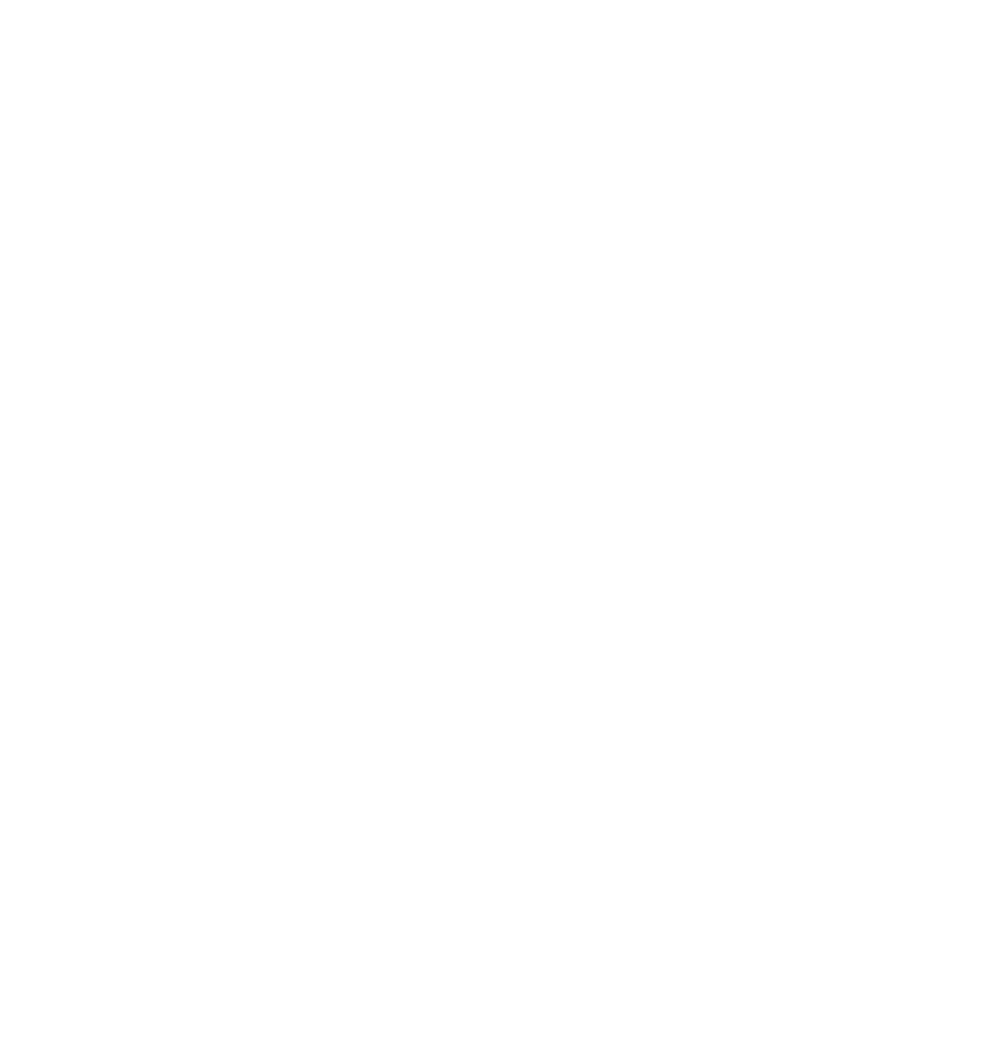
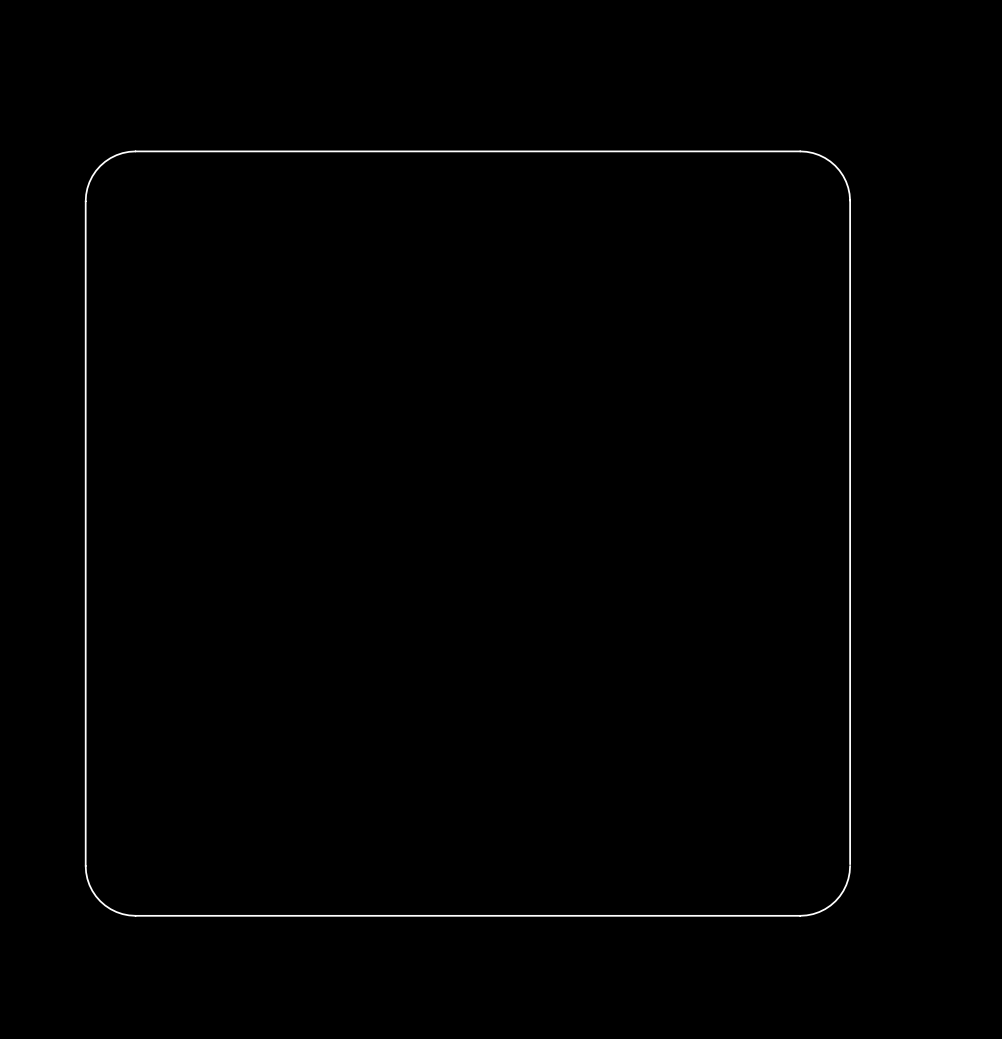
board edge: none -> (850, 864) (850, 200) (846, 181) (835, 165) (819, 155) (800, 151) (135, 151) (116, 155) (100, 166) (89, 182) (85, 201) (85, 865) (89, 885) (100, 901) (116, 912) (135, 915) (800, 915) (819, 912) (835, 901) (846, 885) (850, 865)

